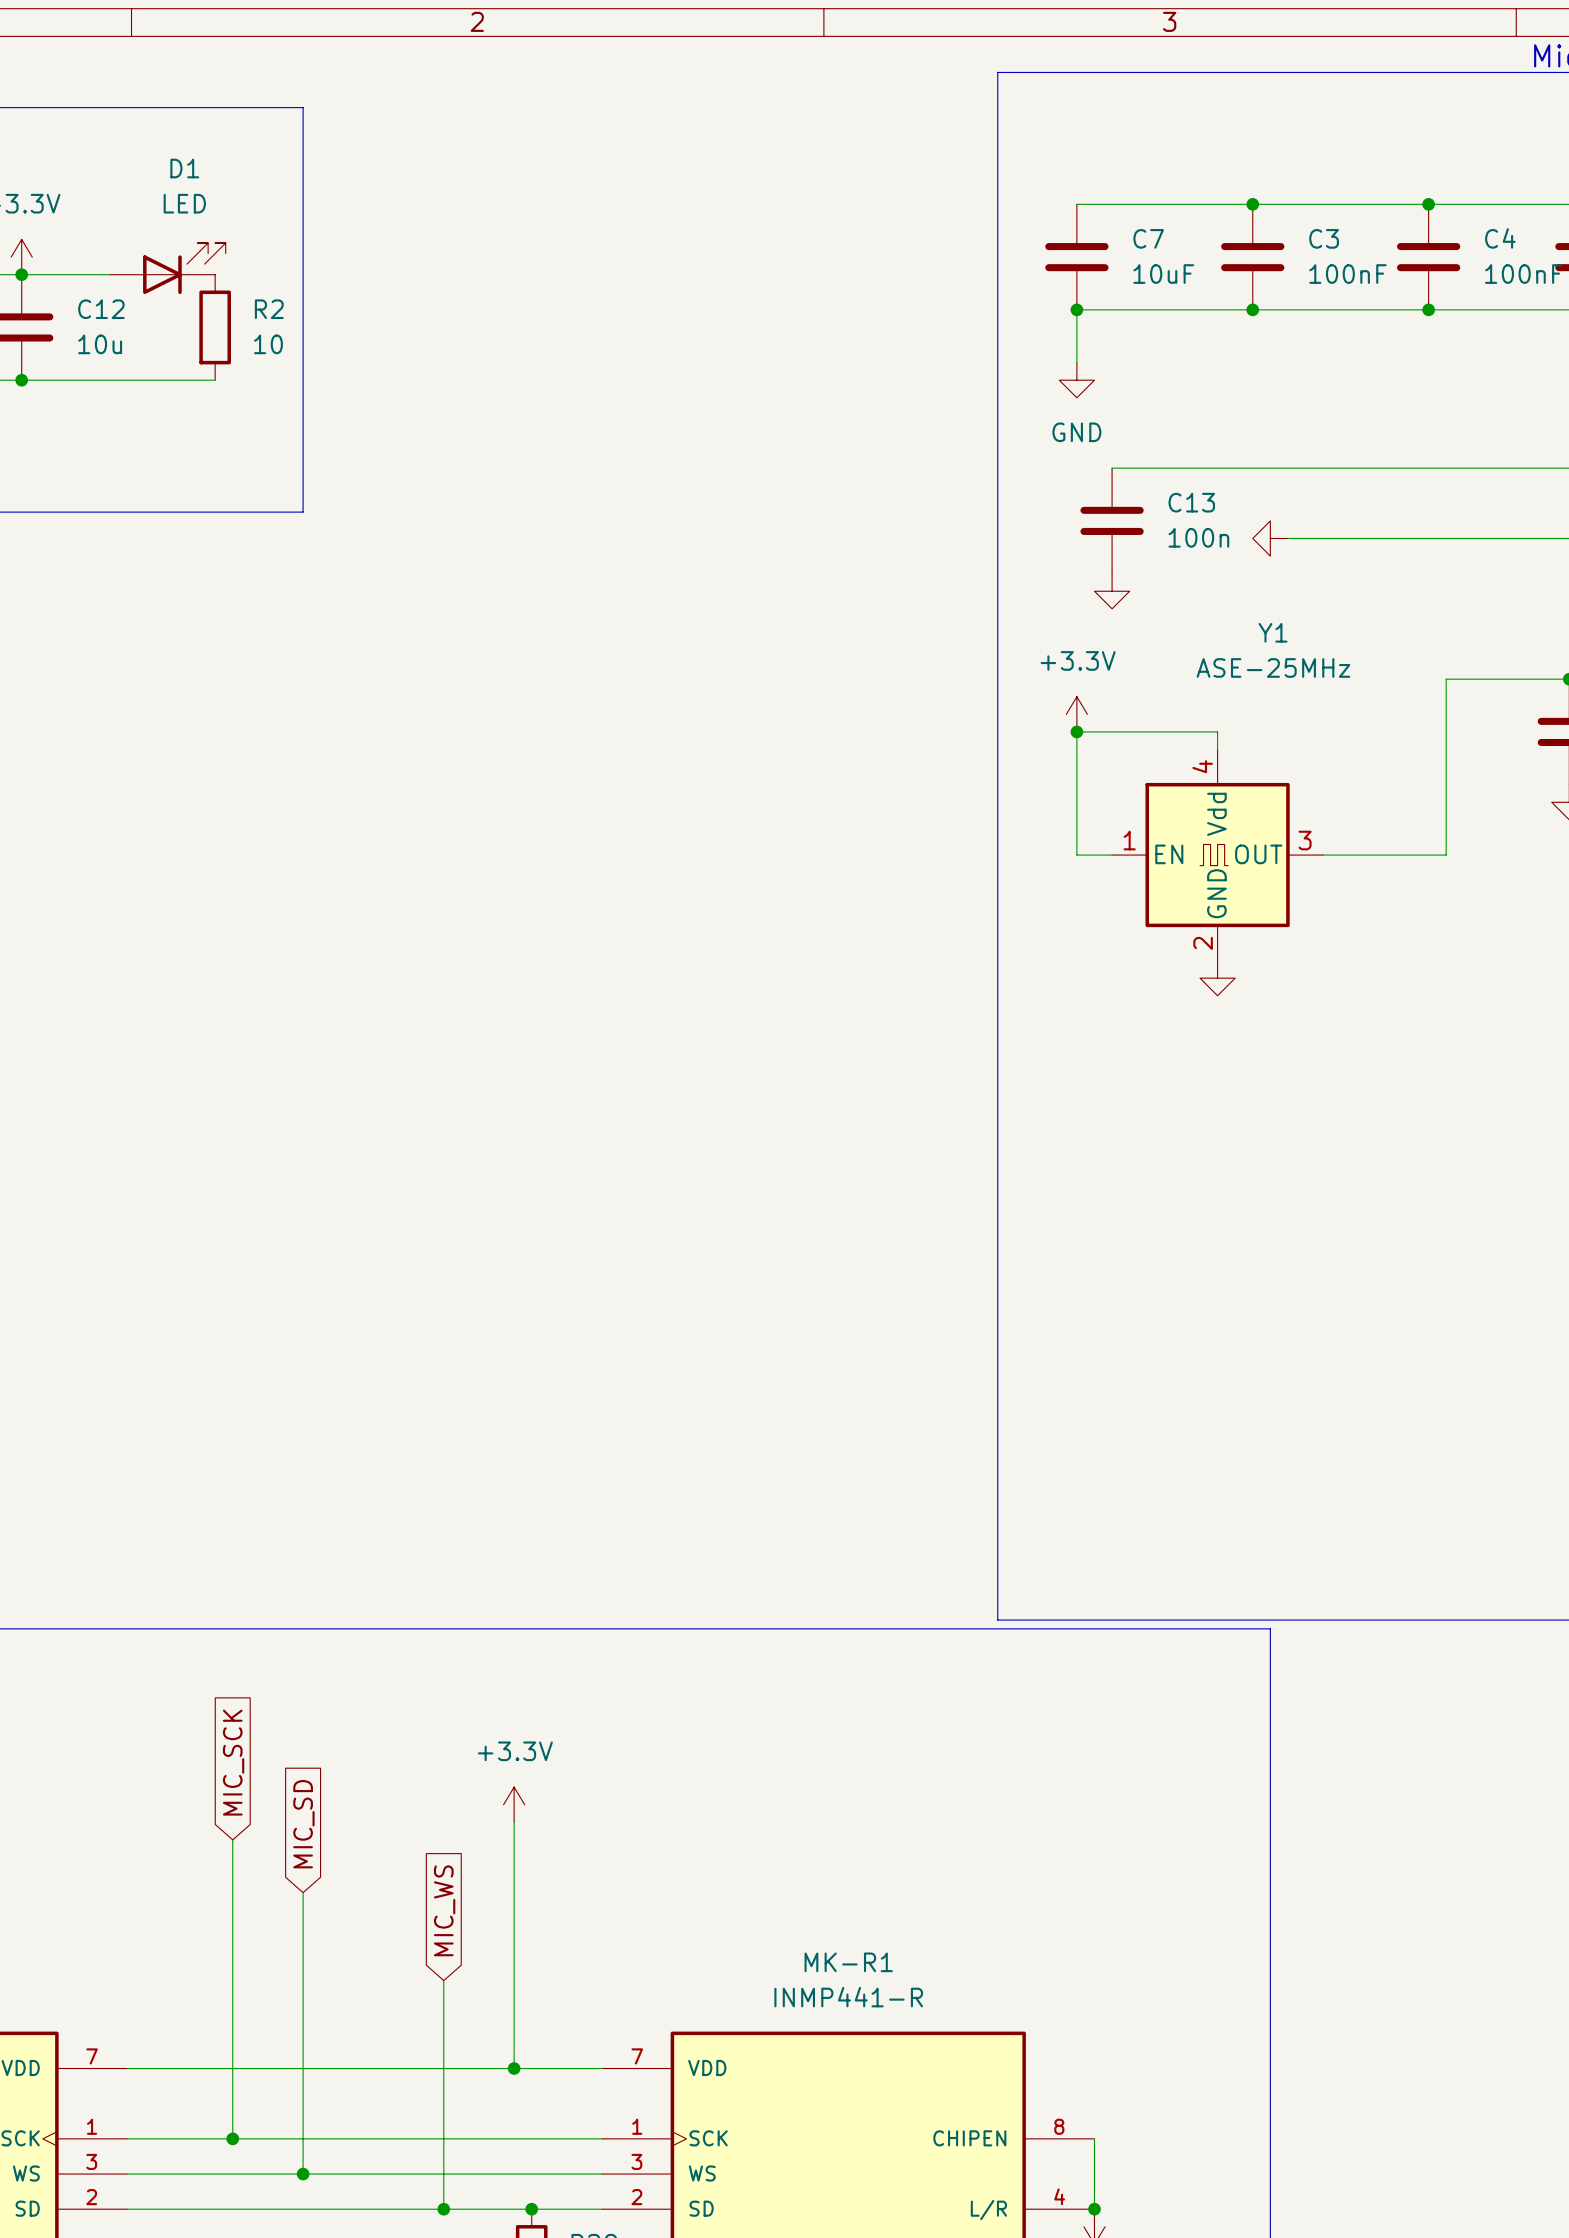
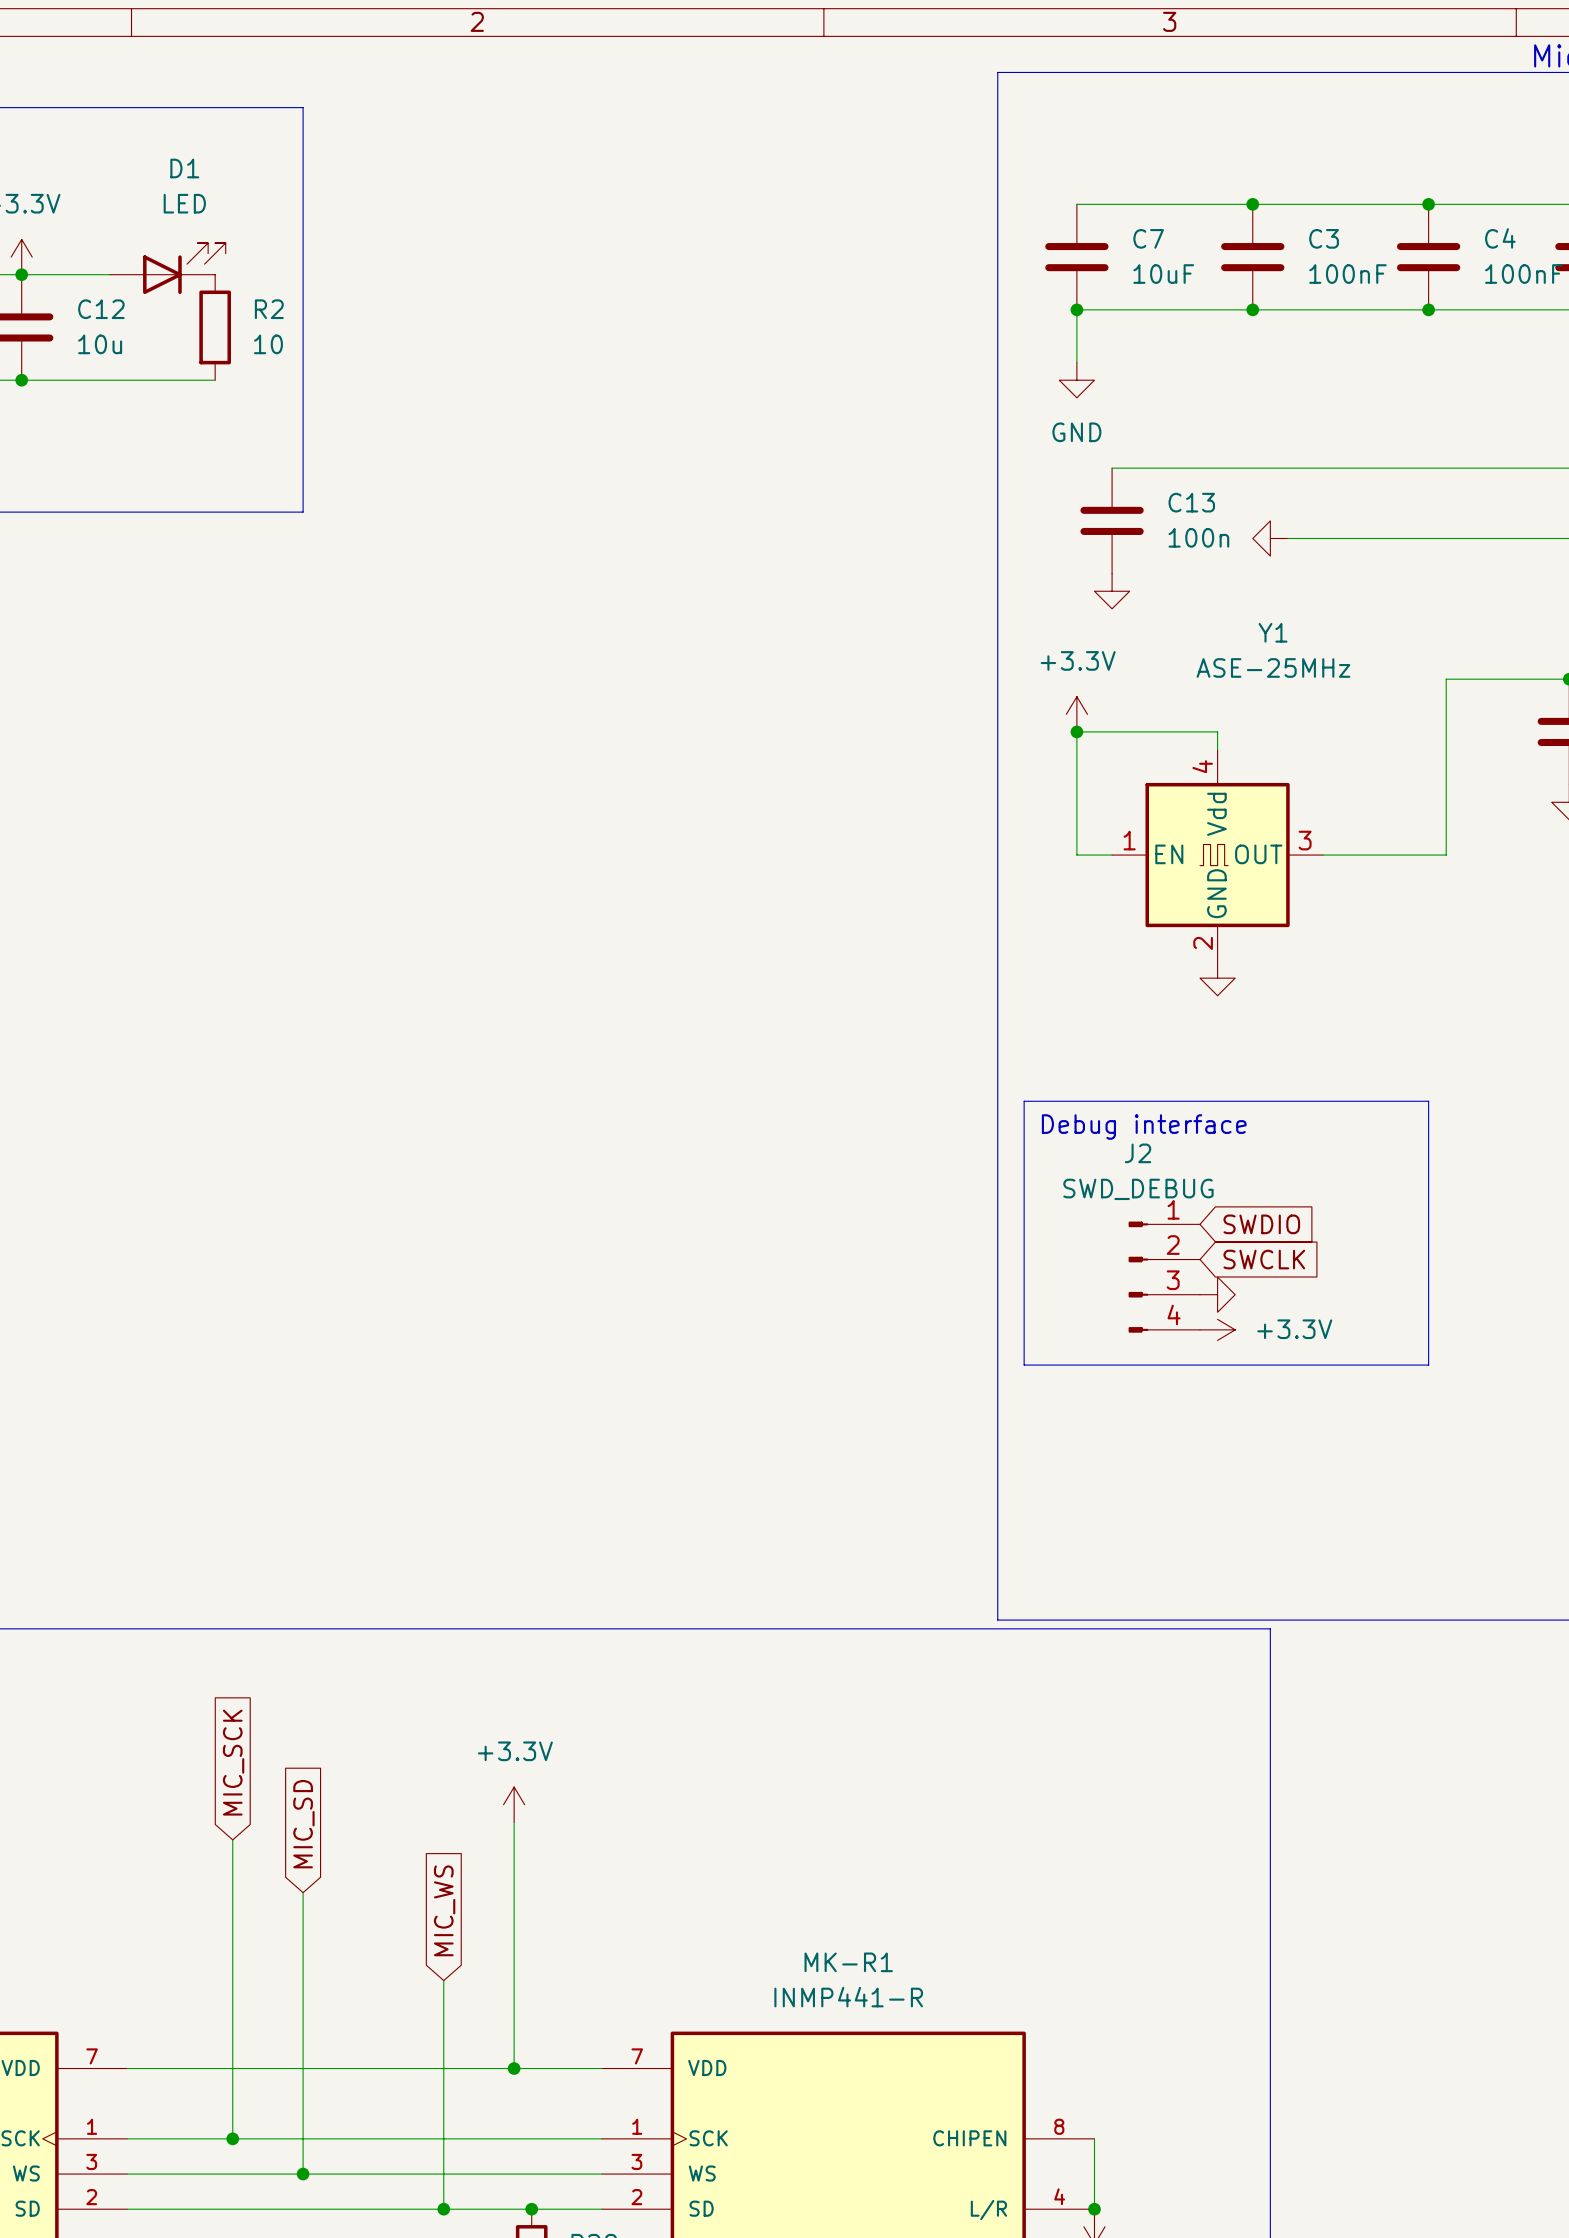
line: none -> (1024, 1101) (1428, 1101) (1428, 1365) (1024, 1365) (1024, 1101)
text: none -> Debug interface (1144, 1127)
global label: none -> SWDIO (1261, 1224)
global label: none -> SWCLK (1264, 1259)
J2: none -> SWD_DEBUG (1164, 1277)
power symbol: none -> (1217, 1294)
power symbol: none -> +3.3V (1217, 1329)

